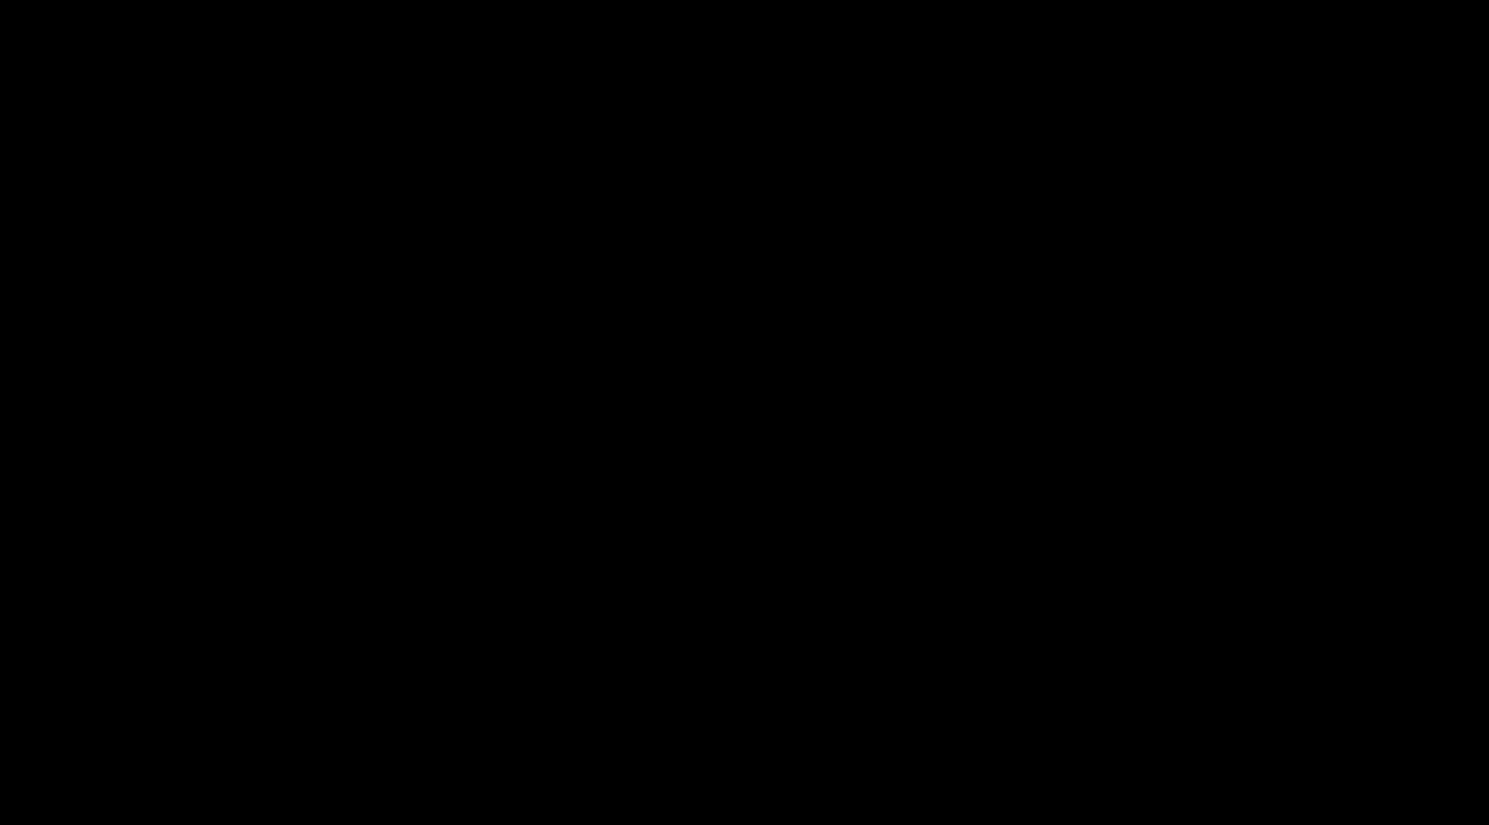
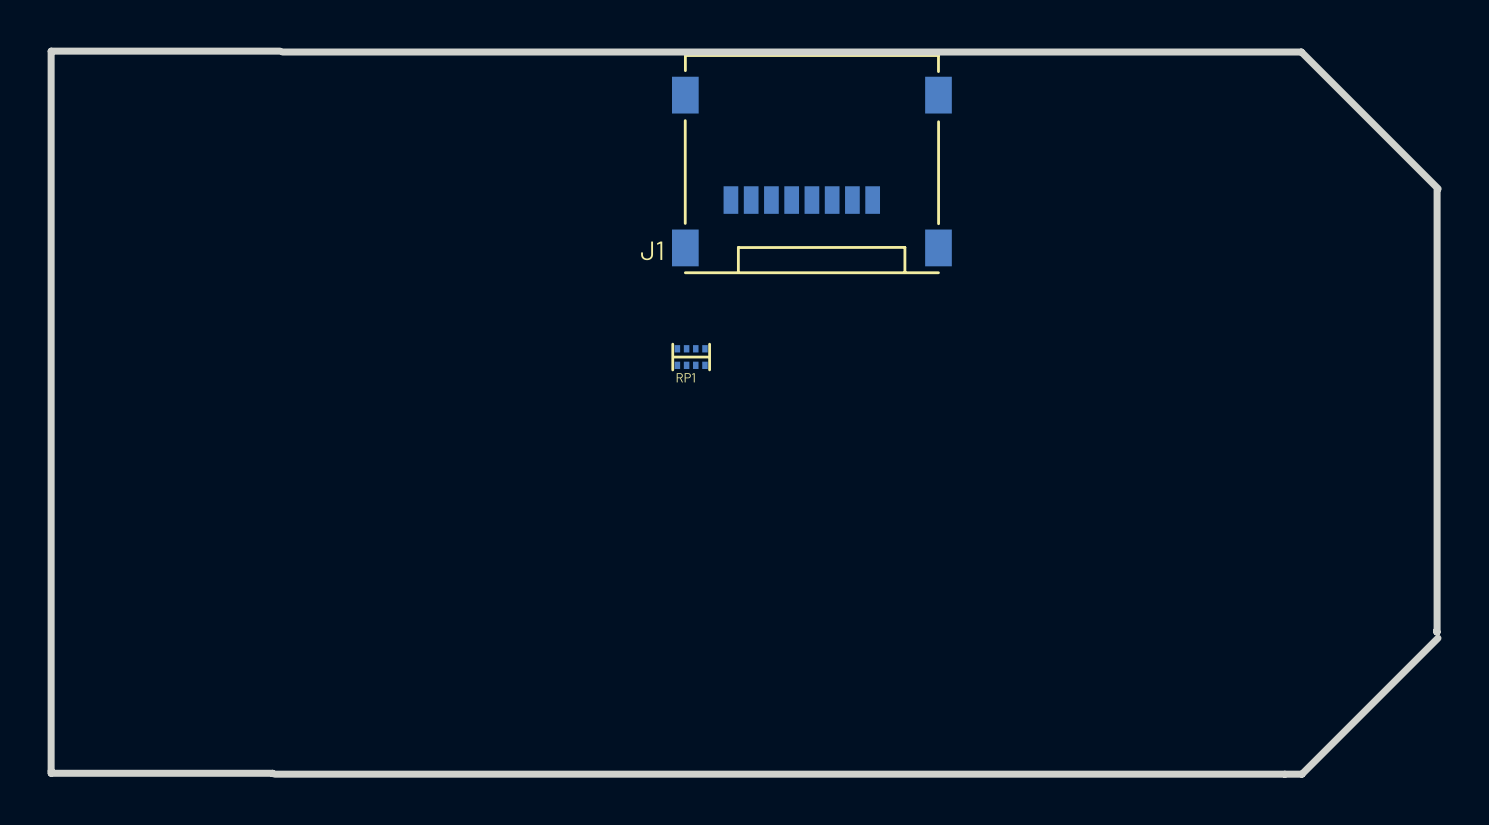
board edge: none -> (280, 51) (51, 51) (51, 773) (272, 773)
board edge: none -> (282, 52) (1301, 52) (1438, 188)
J1: none -> (811, 164)
board edge: none -> (1437, 190) (1436, 630)
RP1: none -> (691, 357)
board edge: none -> (1437, 638) (1301, 774) (274, 774)

